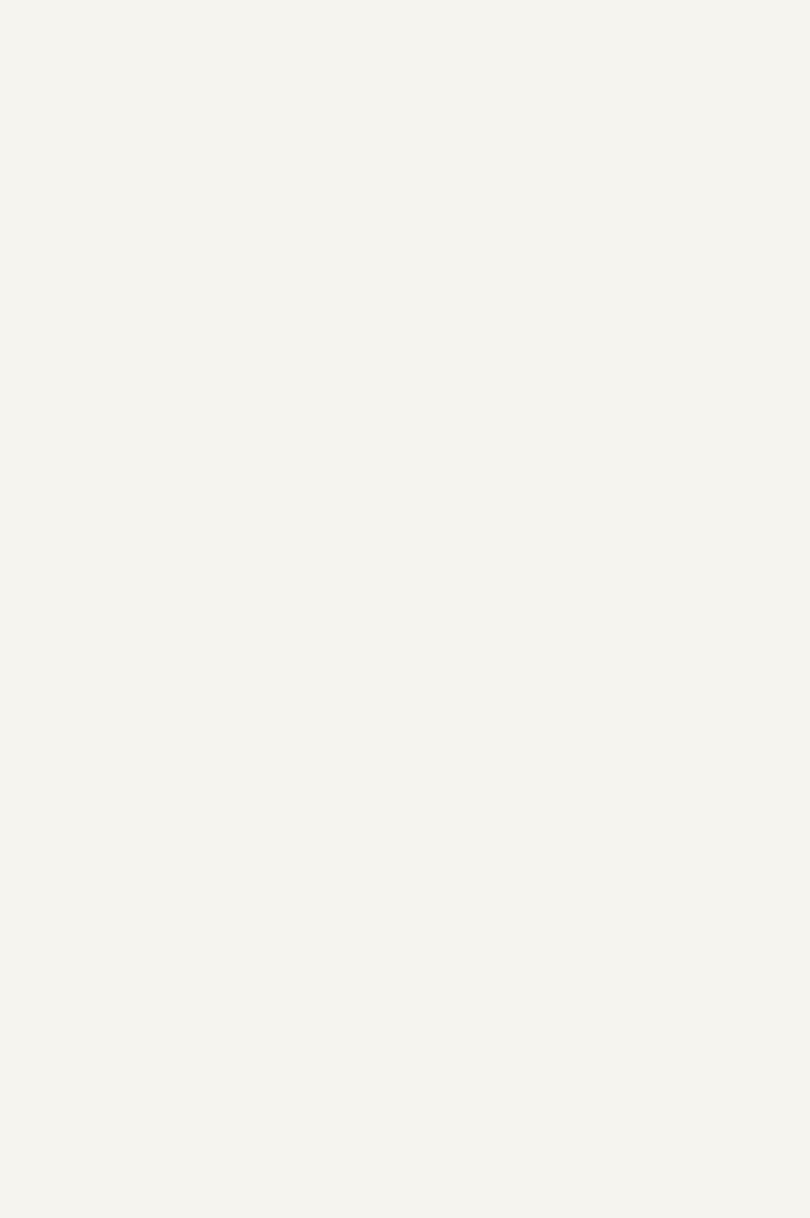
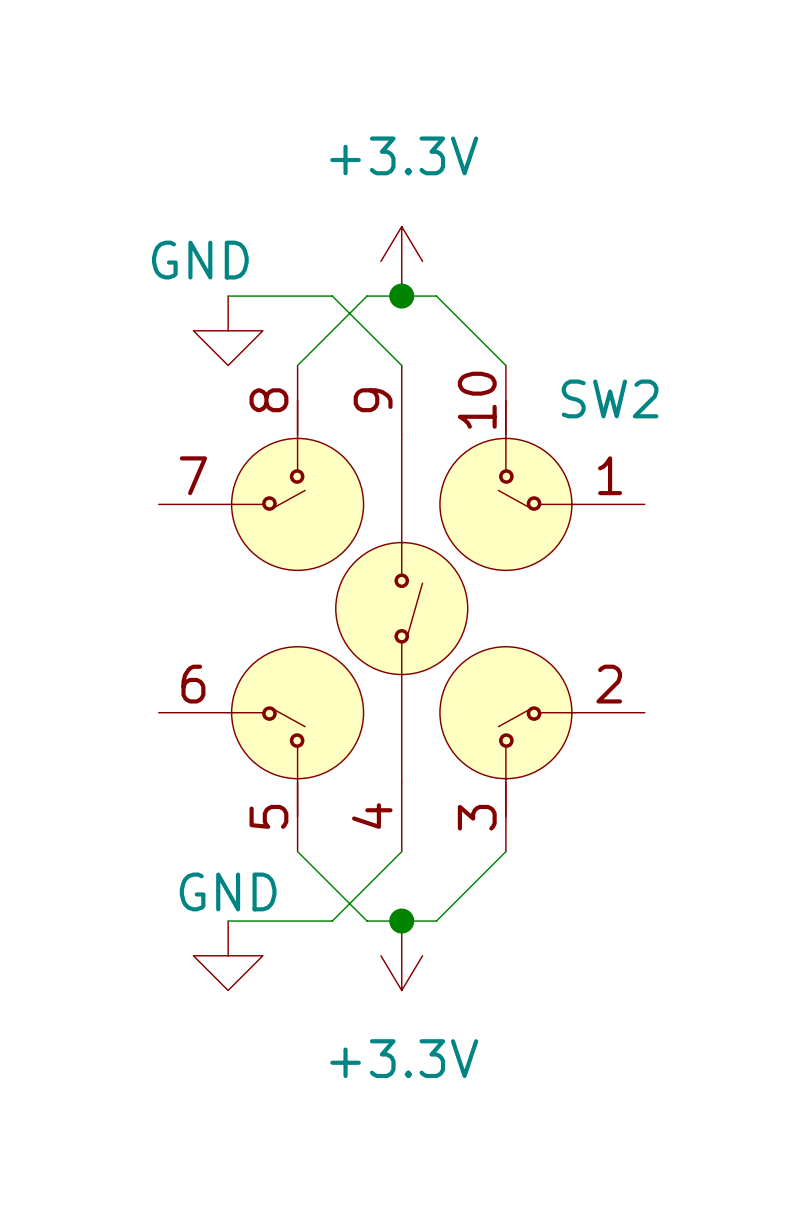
power symbol: none -> +3.3V (401, 261)
wire: none -> (228, 296) (332, 296) (401, 365)
junction: none -> (401, 296)
power symbol: none -> GND (228, 330)
wire: none -> (297, 365) (367, 296) (436, 296) (505, 365)
SW2: none -> (401, 608)
wire: none -> (297, 851) (367, 921) (436, 921) (505, 851)
wire: none -> (401, 851) (332, 921) (228, 921)
junction: none -> (401, 921)
power symbol: none -> GND (228, 955)
power symbol: none -> +3.3V (401, 955)

